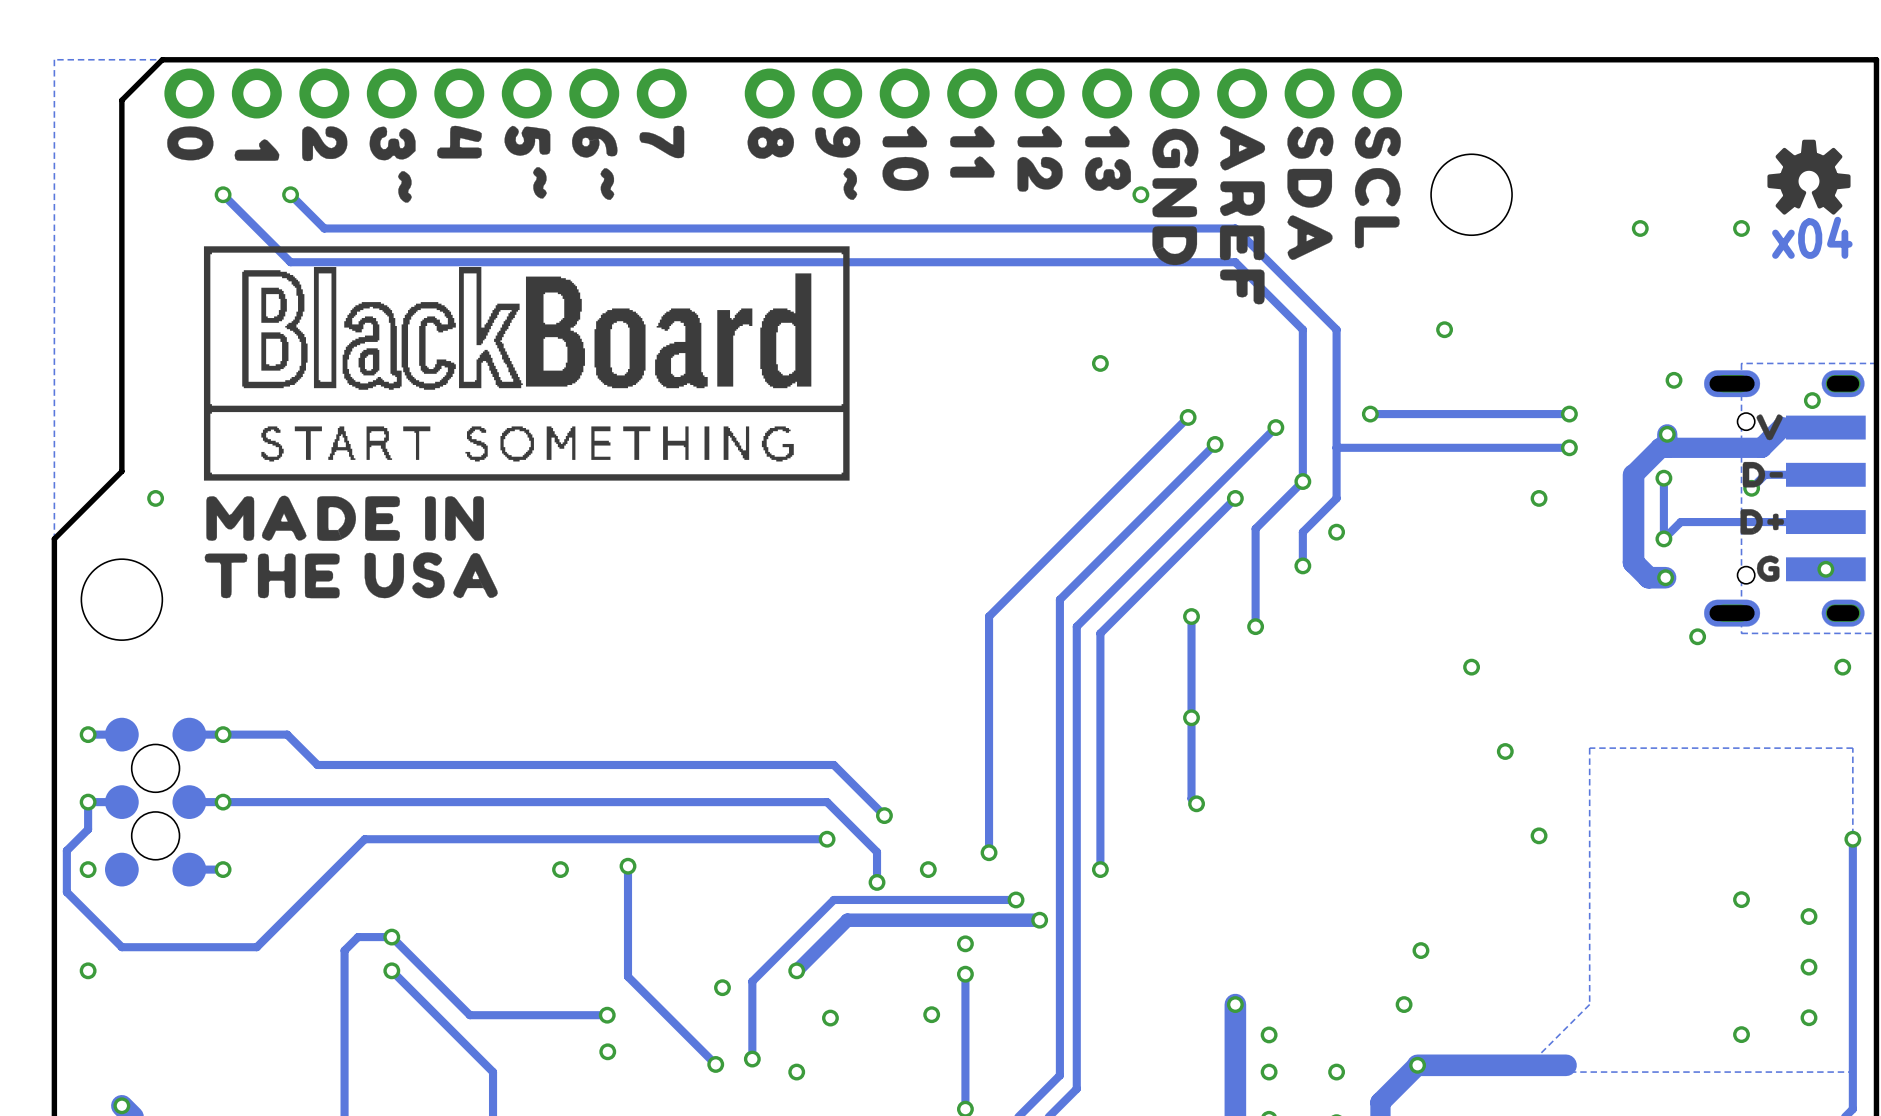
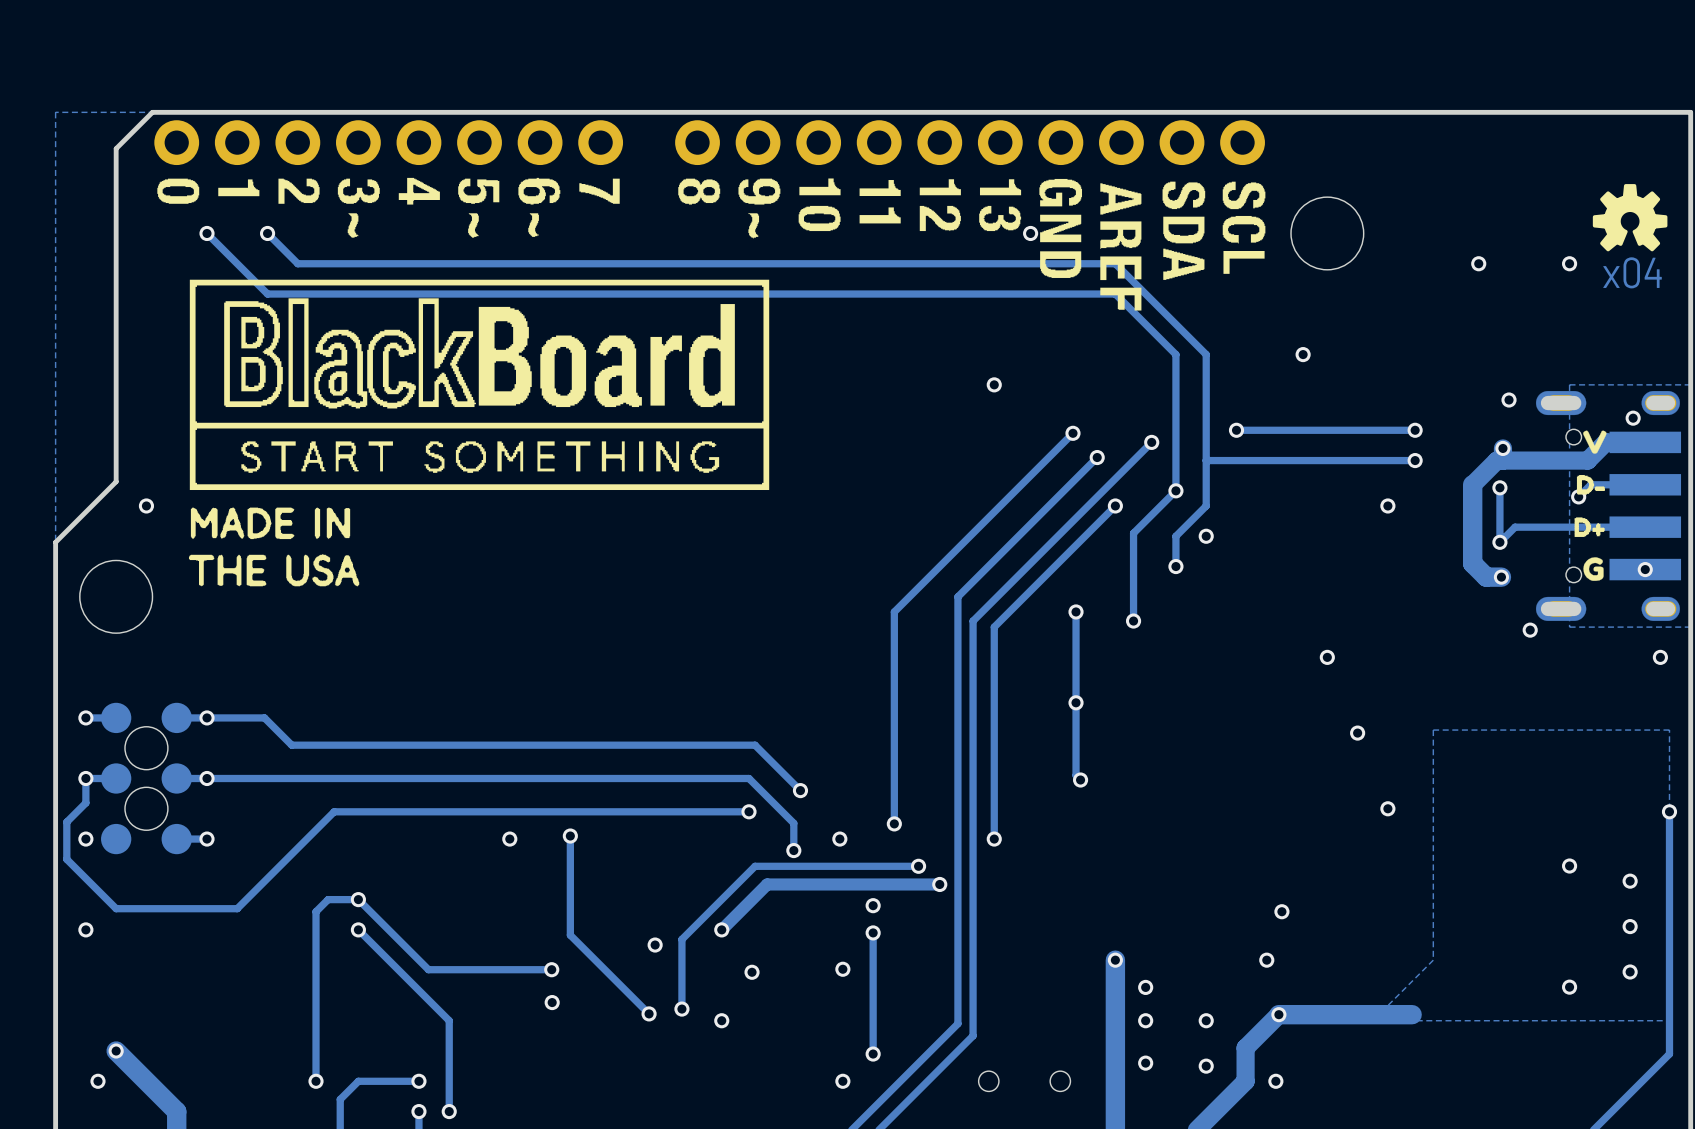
drawing: [167, 125, 685, 203] -> none
drawing: [747, 125, 1401, 305] -> none
drawing: none -> [157, 177, 620, 238]
drawing: none -> [678, 178, 1266, 311]
drawing shape: [1742, 461, 1783, 488] -> [1576, 475, 1605, 495]
drawing: [204, 495, 498, 599] -> none
drawing: none -> [188, 507, 360, 587]
drawing shape: [1740, 509, 1785, 535] -> [1574, 517, 1605, 537]

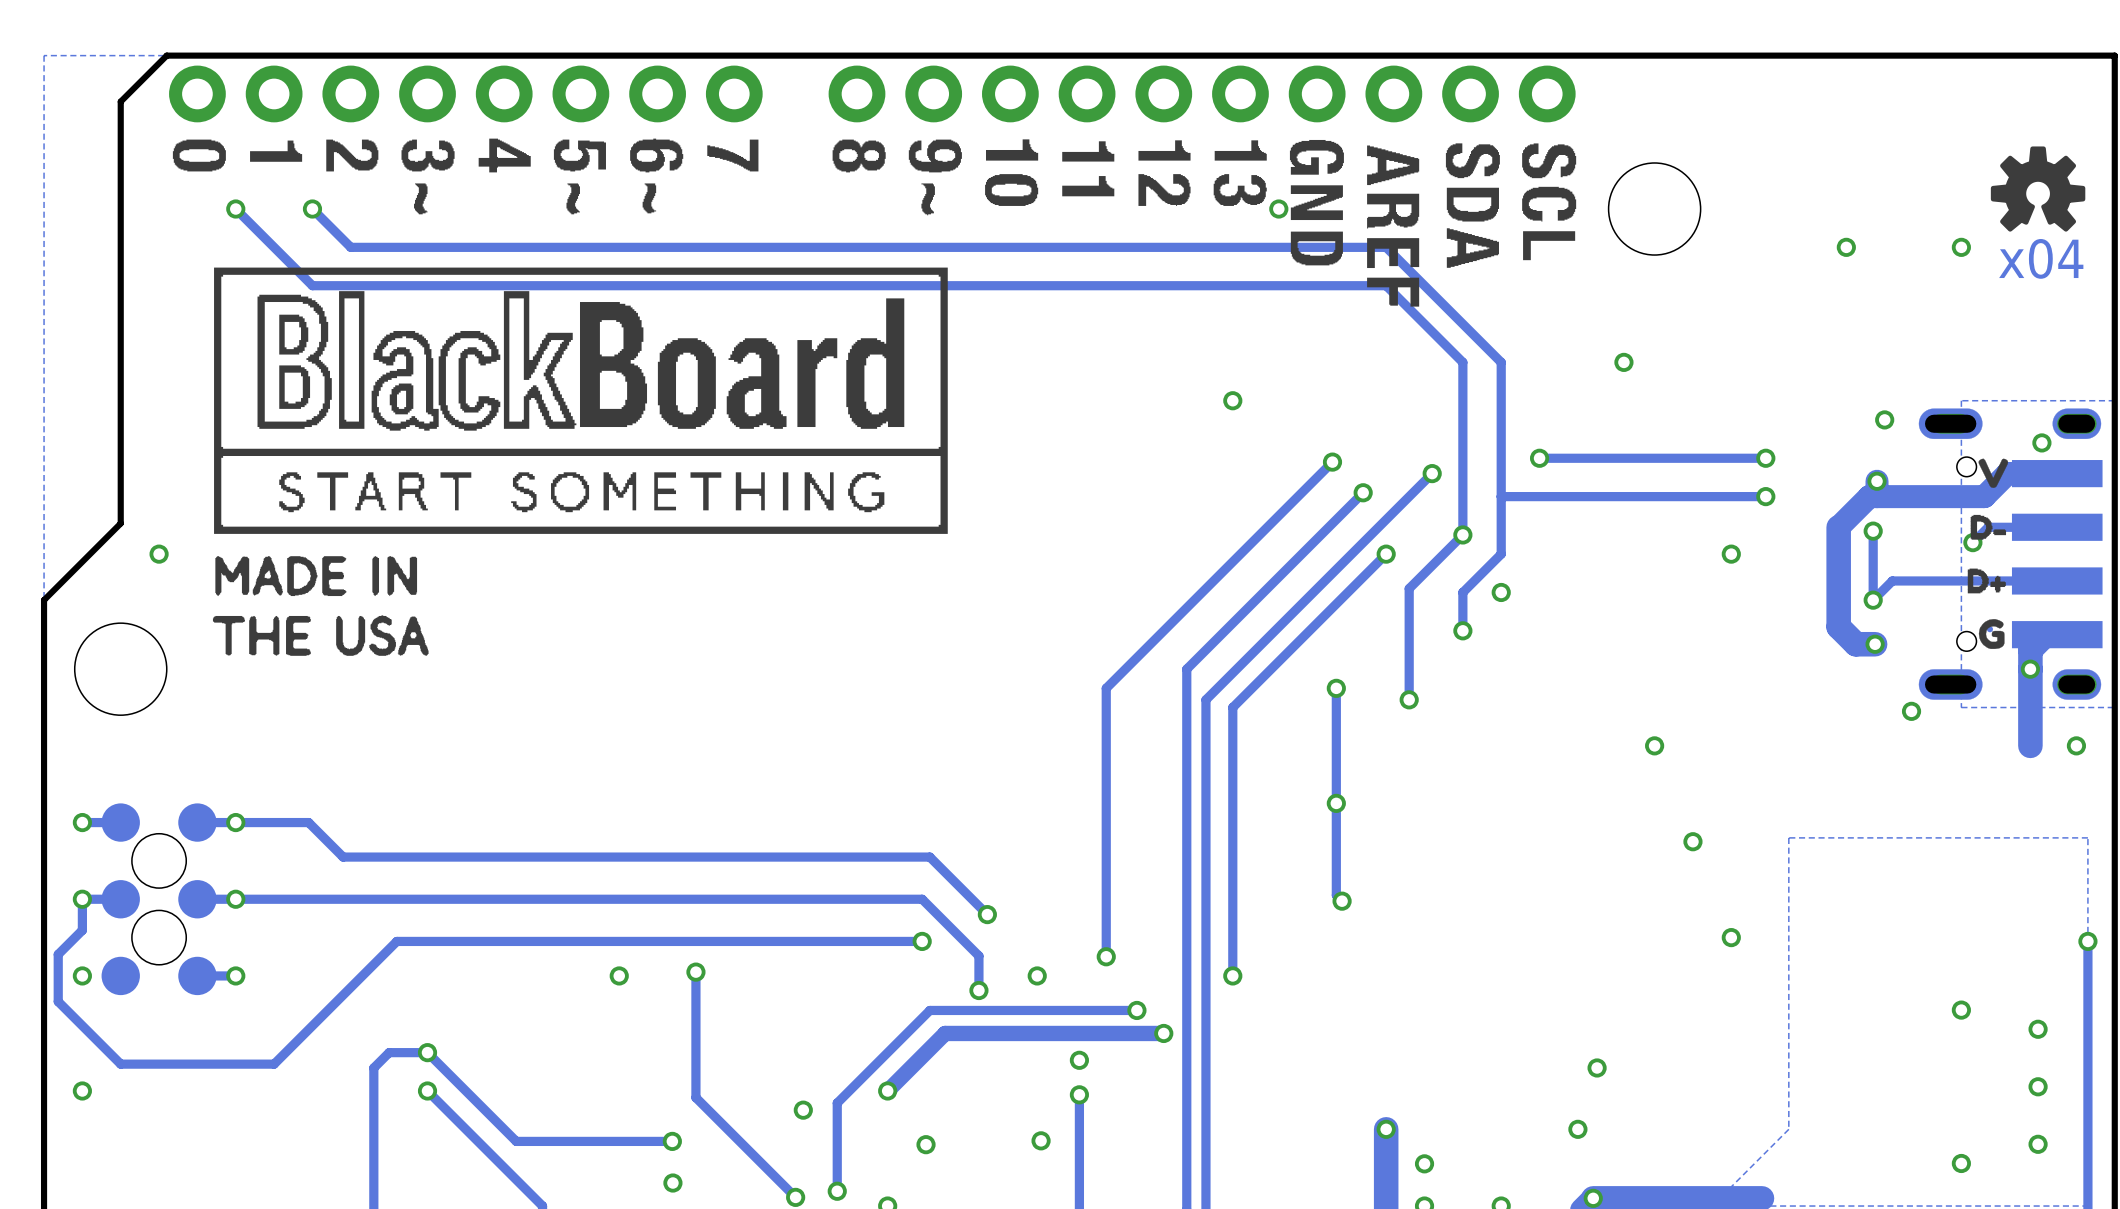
track: none -> (2057, 634) (2045, 634) (2030, 650) (2030, 745)
via position: (1645, 569) -> (2030, 669)

